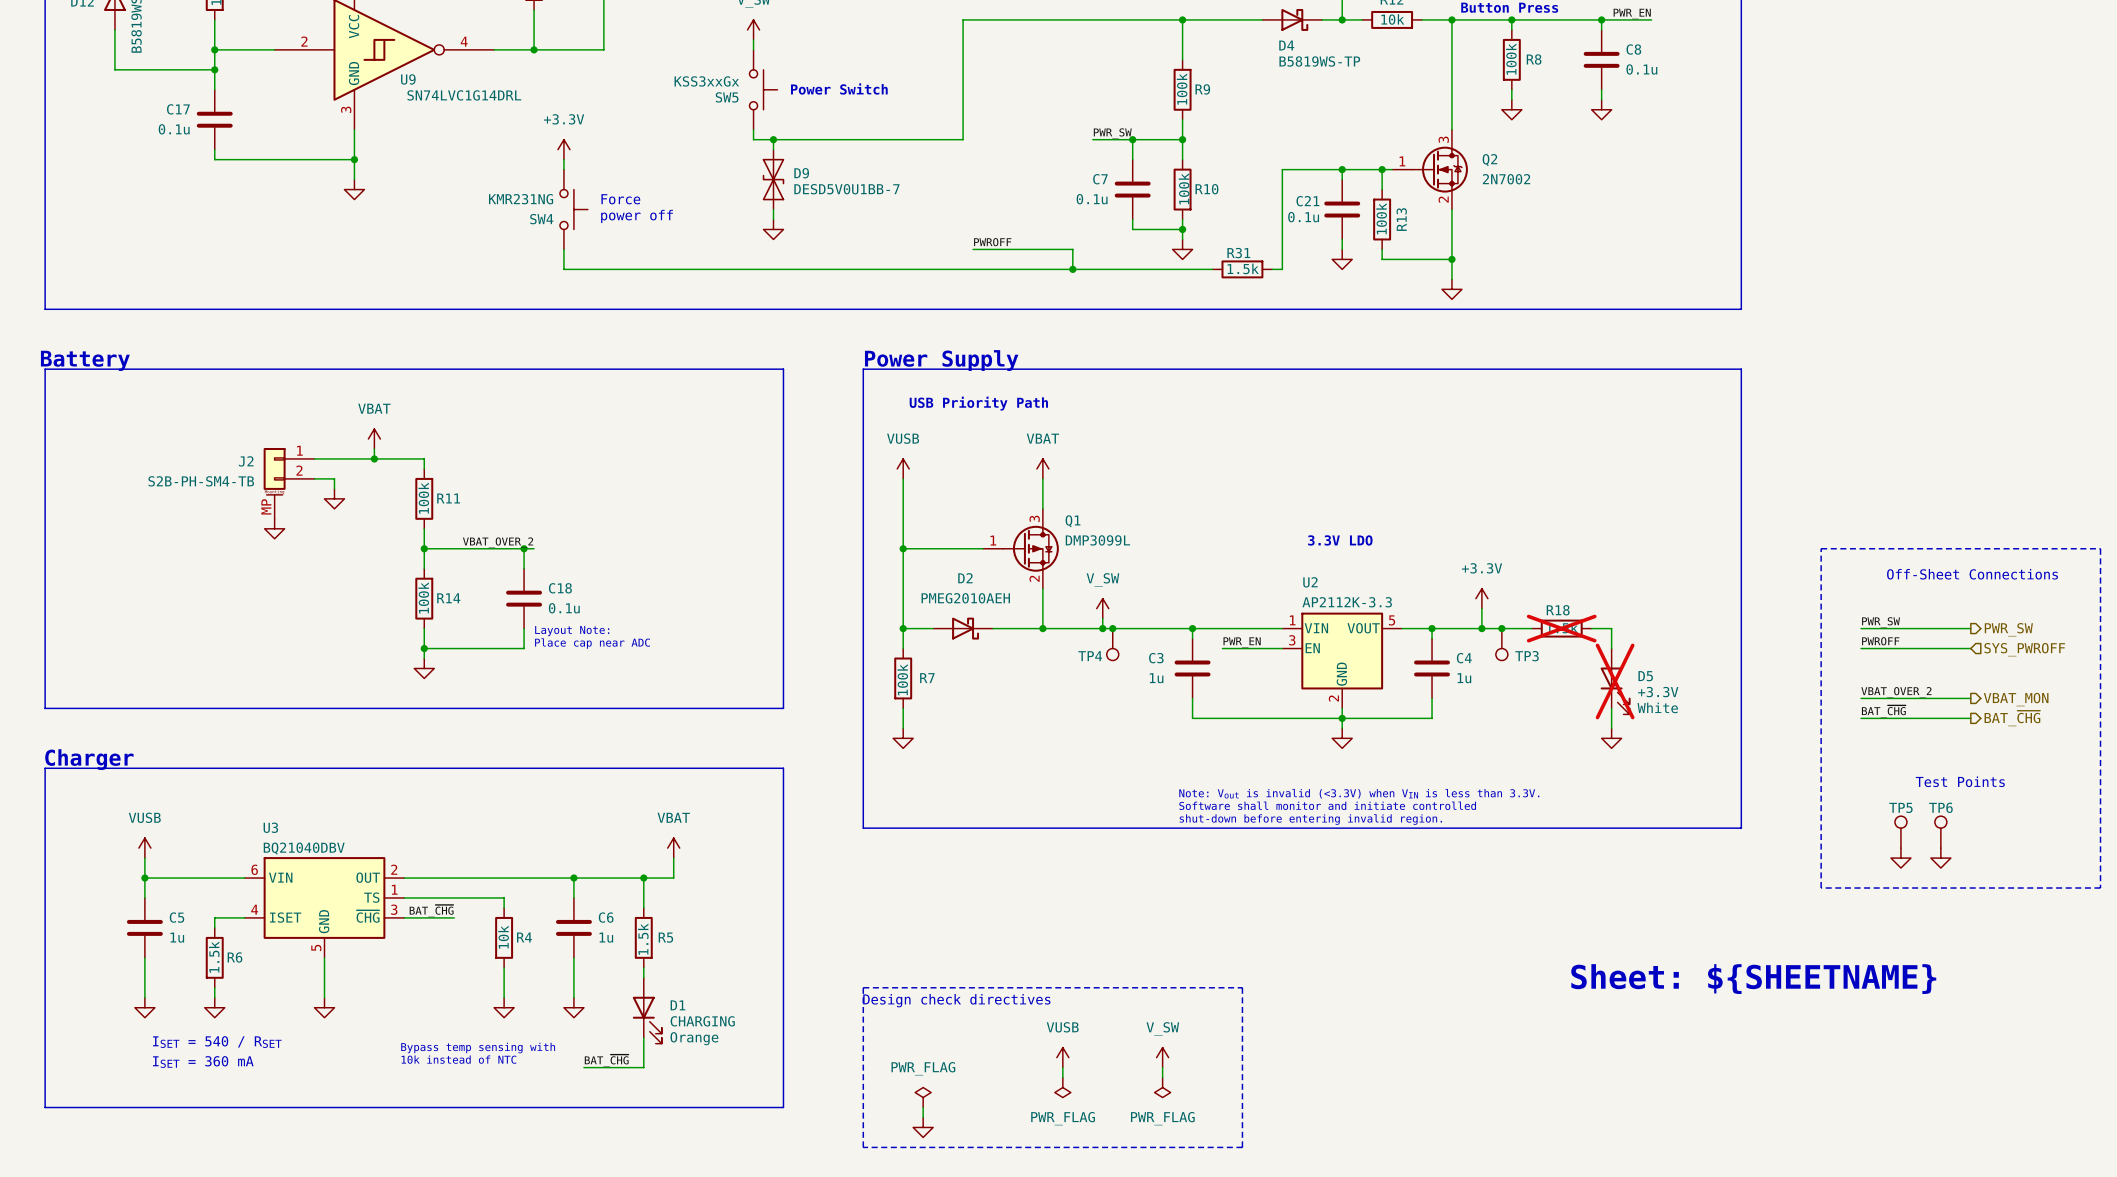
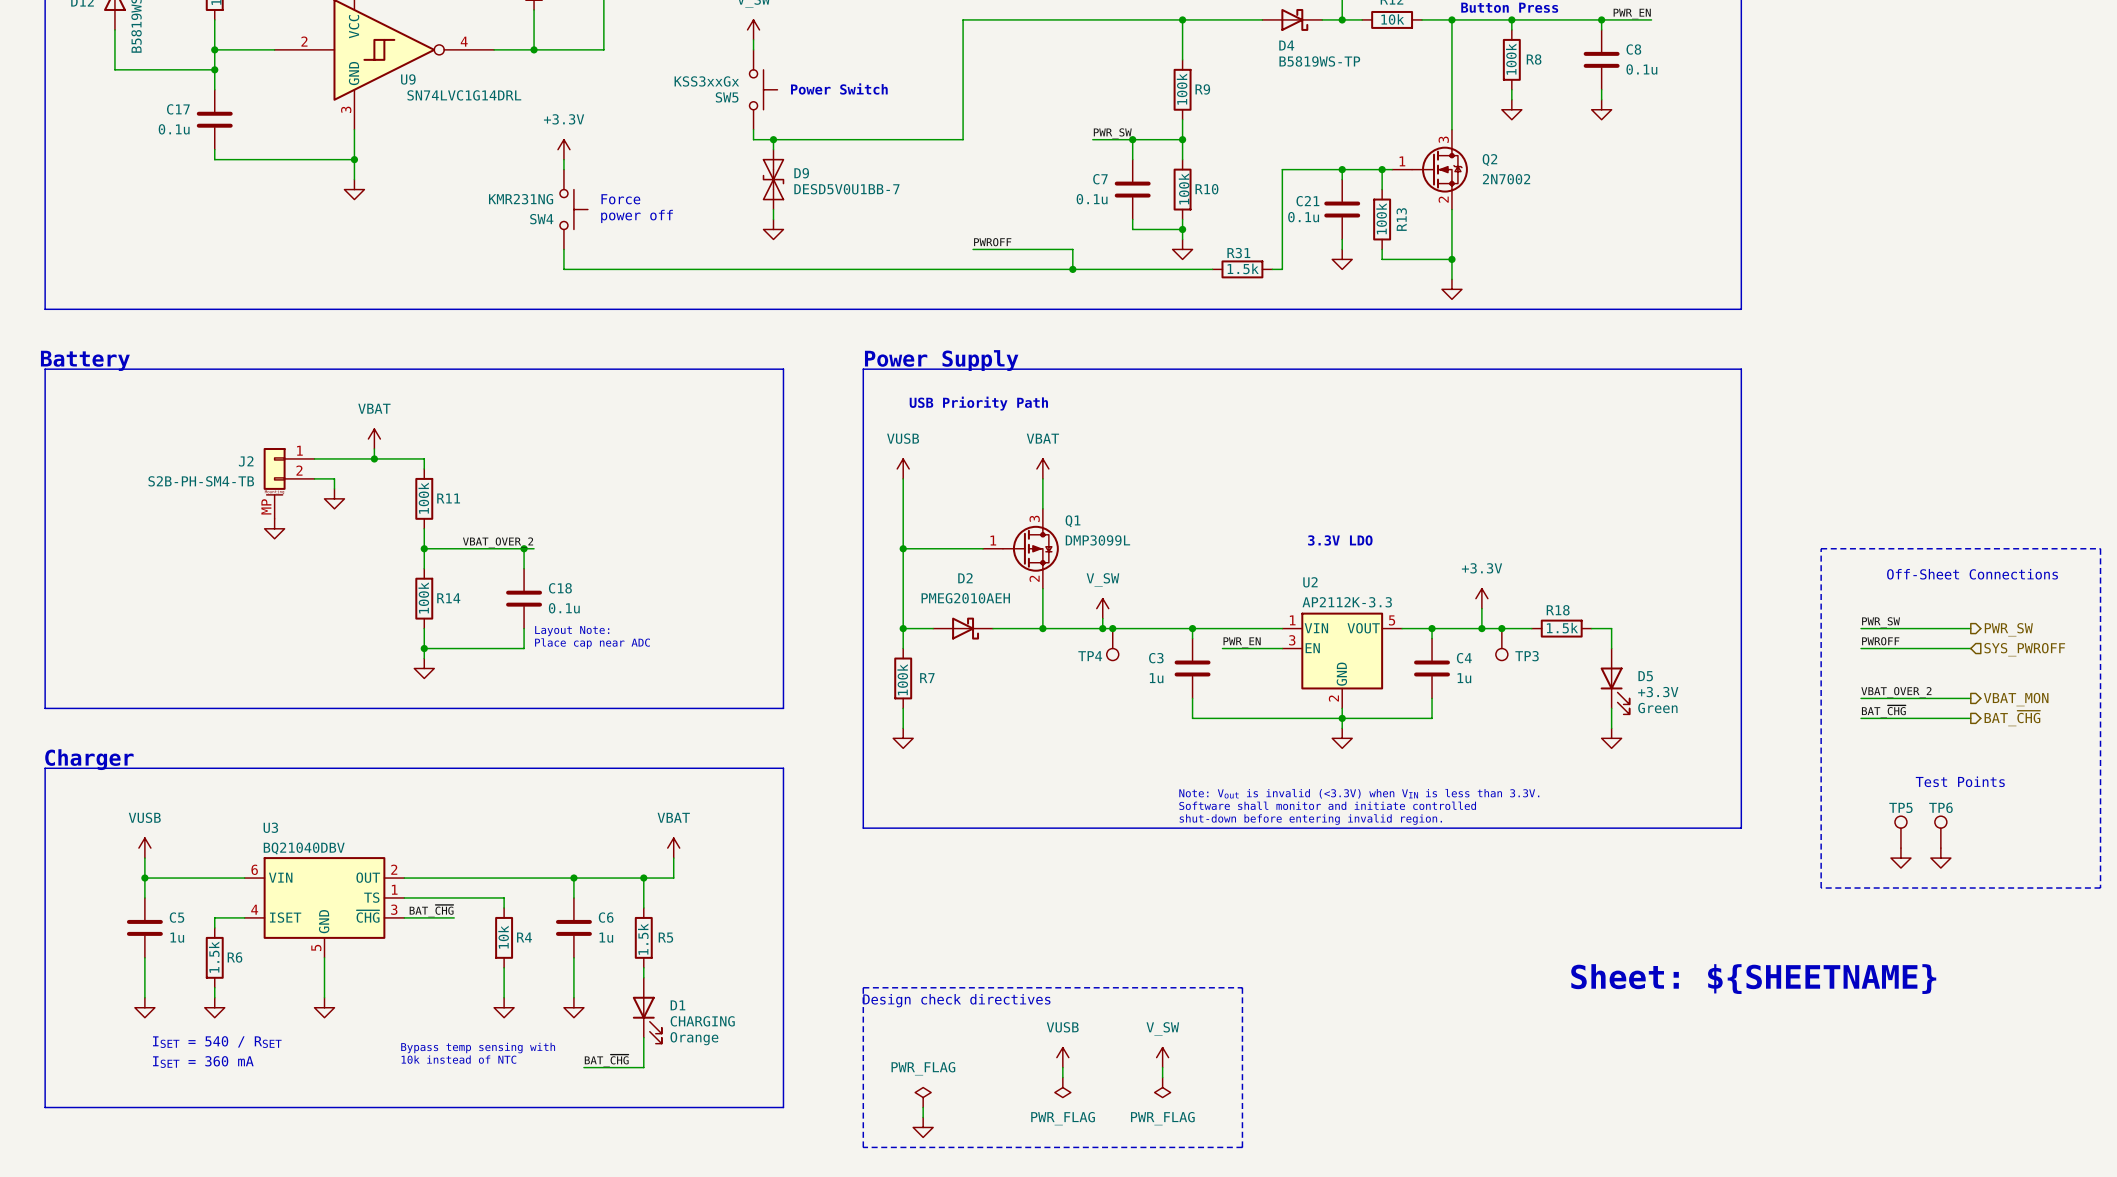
R18 do-not-place cross: (1561, 628) -> none
D5 do-not-place cross: (1615, 681) -> none
D5 text: White (1657, 707) -> Green (1657, 708)

